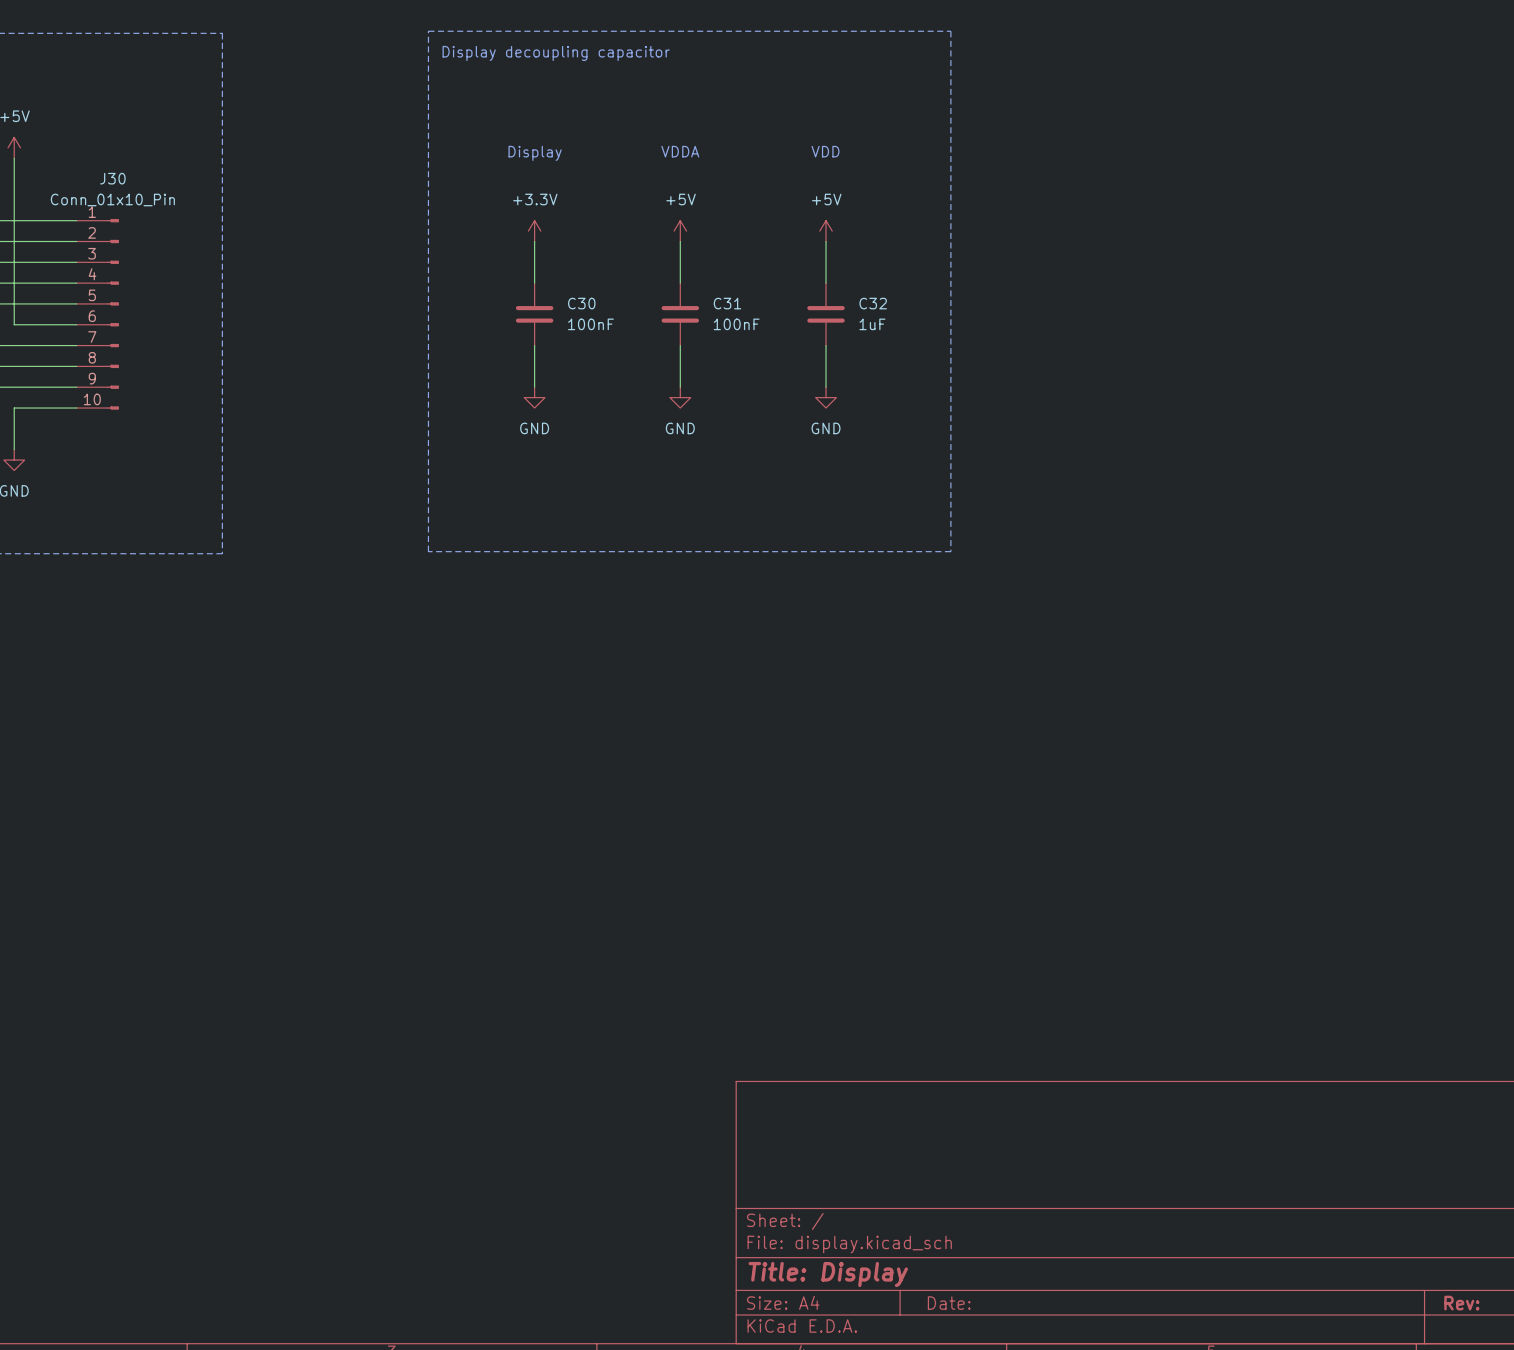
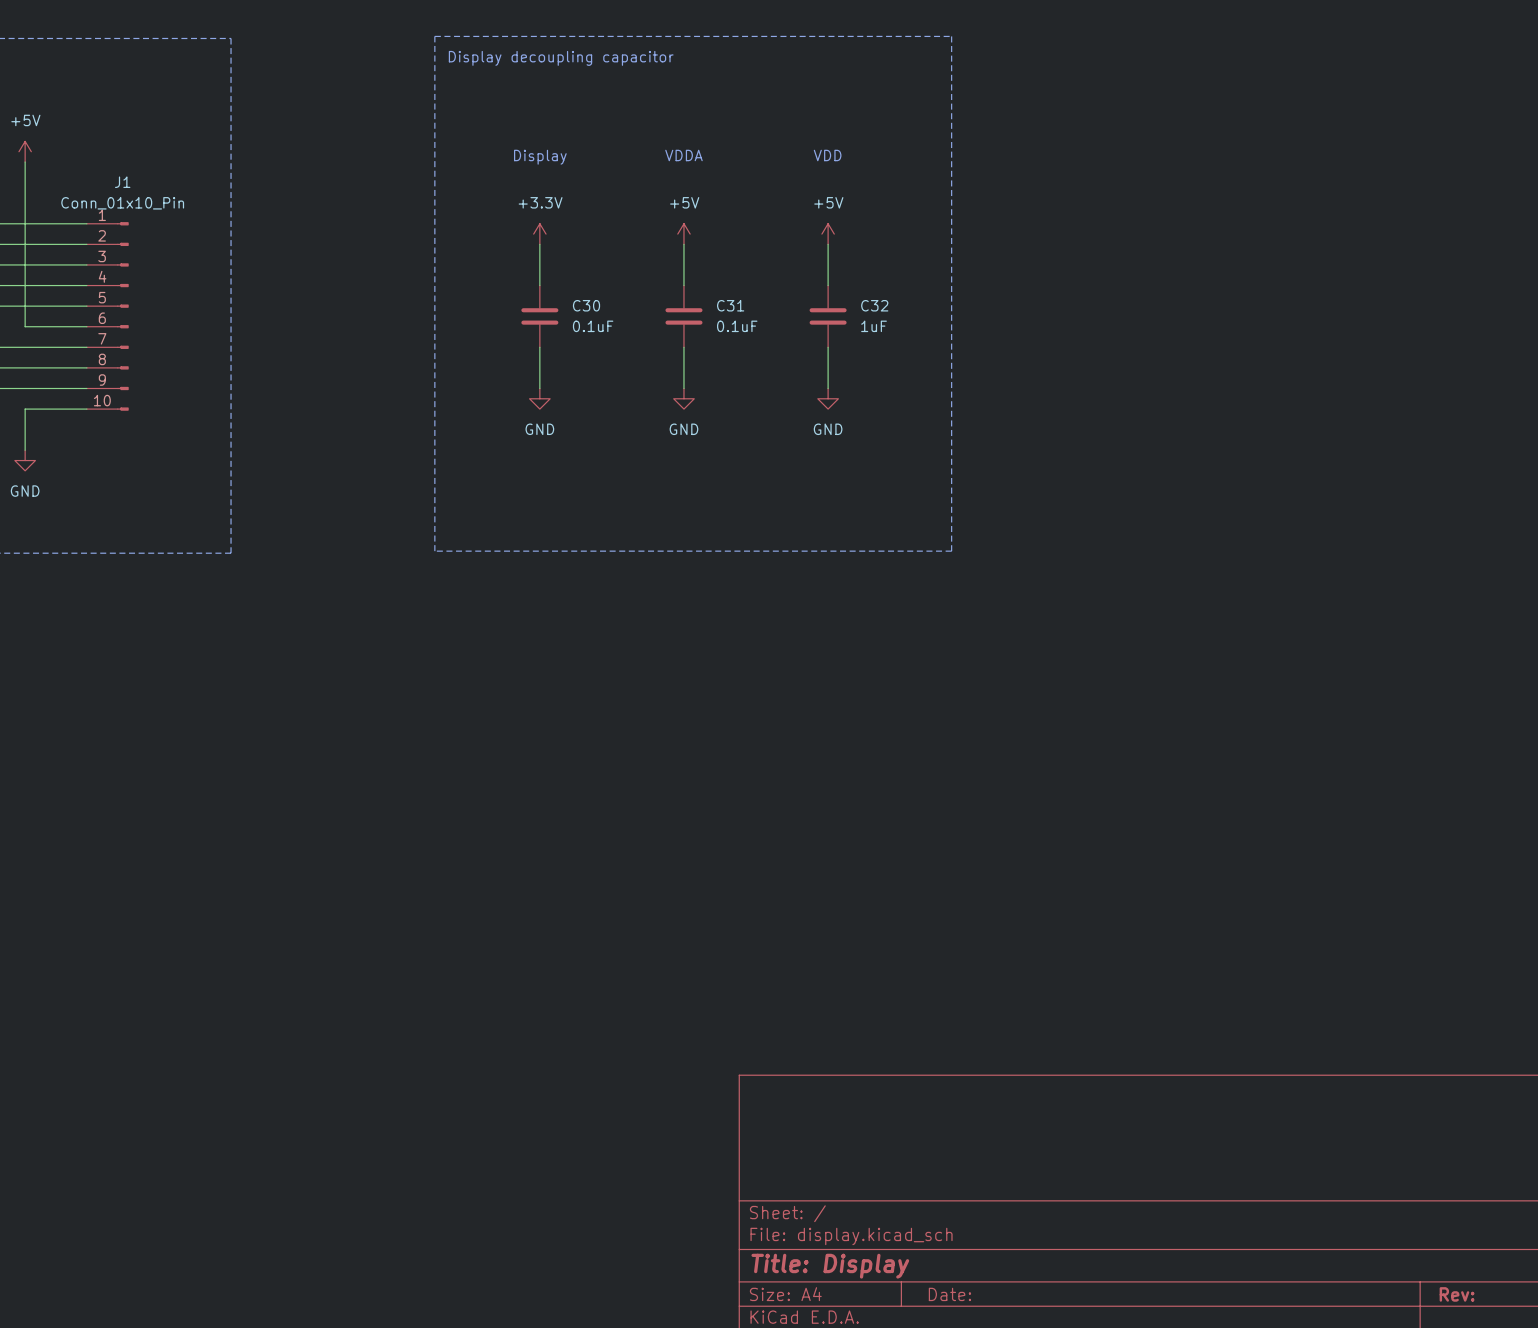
J30 name: J30 (112, 178) -> J1 (122, 182)
C30 value: 100nF (590, 324) -> 0.1uF (593, 326)
C31 value: 100nF (736, 324) -> 0.1uF (737, 326)

